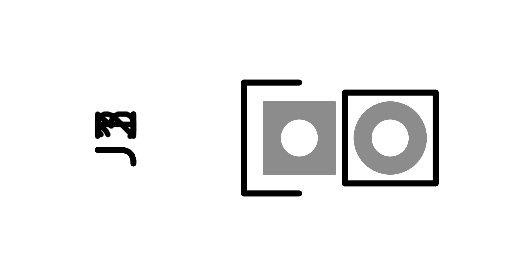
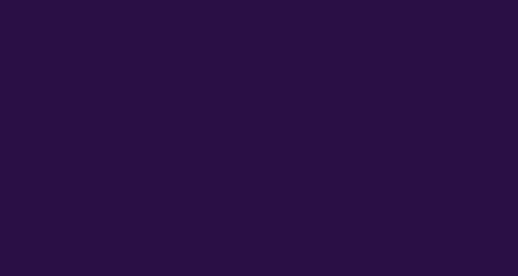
part: (339, 138) -> none
part: (339, 138) -> none
part: (339, 138) -> none

